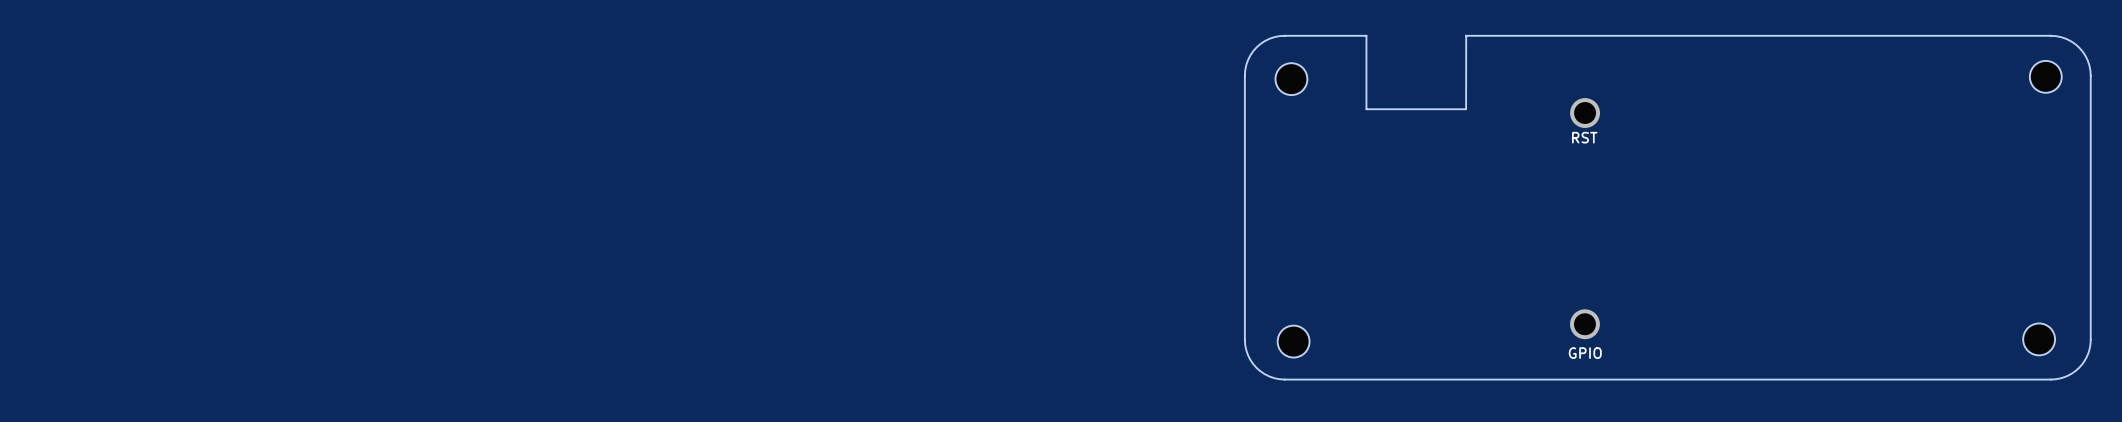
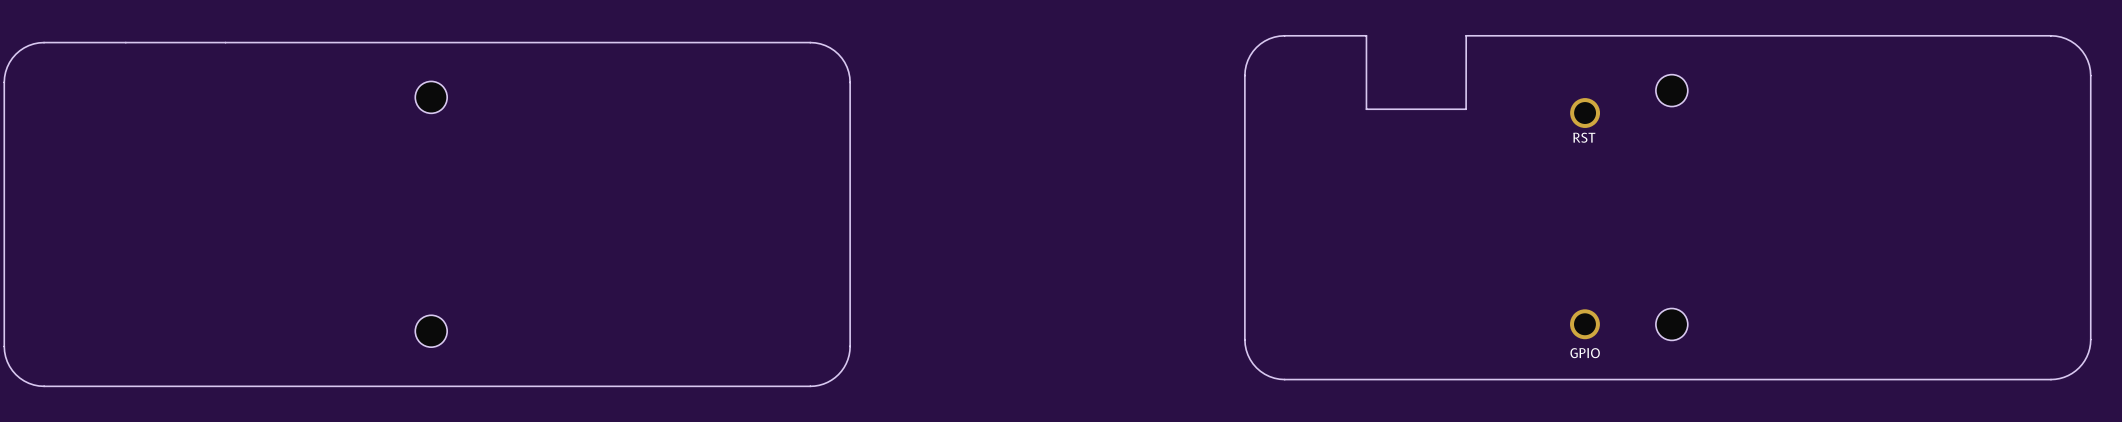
board edge: none -> (44, 42) (810, 42) (825, 45) (841, 58) (849, 77) (850, 346) (847, 359) (835, 377) (823, 384) (810, 386) (44, 386) (28, 383) (12, 370) (4, 351) (4, 82) (7, 67) (15, 54) (28, 45) (44, 42)
part: (2045, 76) -> none
part: (1291, 79) -> none
part: none -> (1671, 90)
part: none -> (431, 97)
part: none -> (1671, 324)
part: none -> (431, 331)
part: (2039, 339) -> none
part: (1293, 341) -> none

